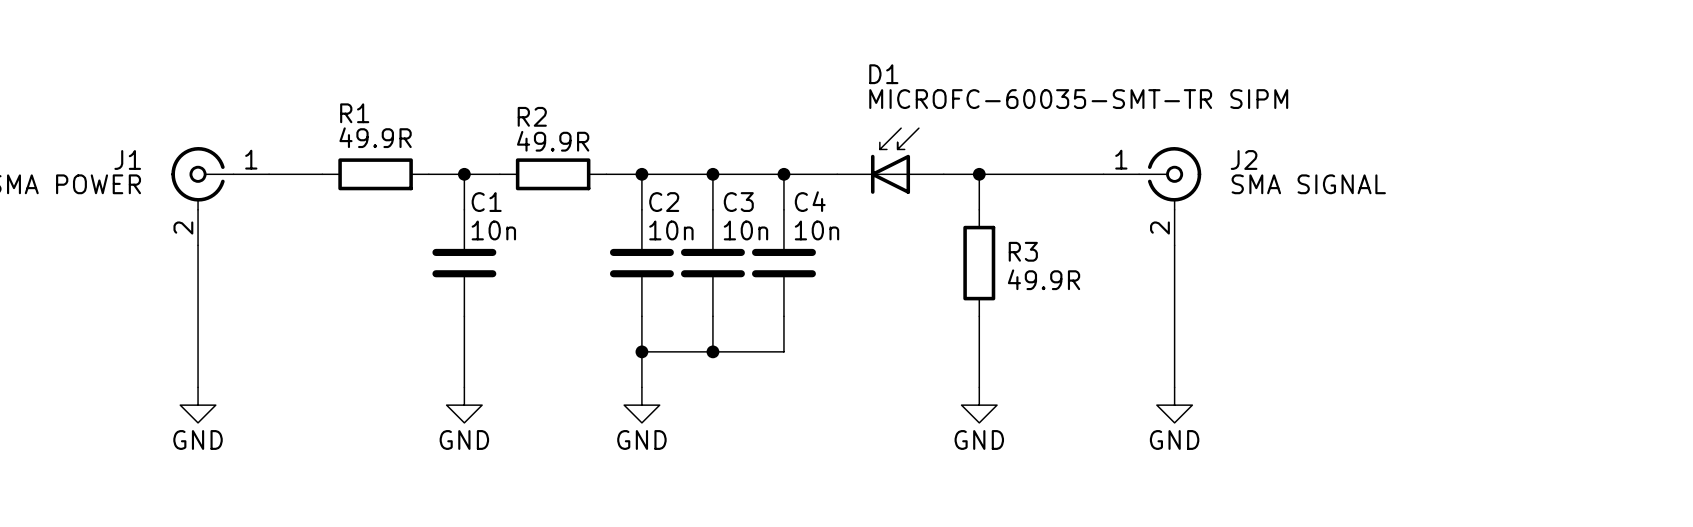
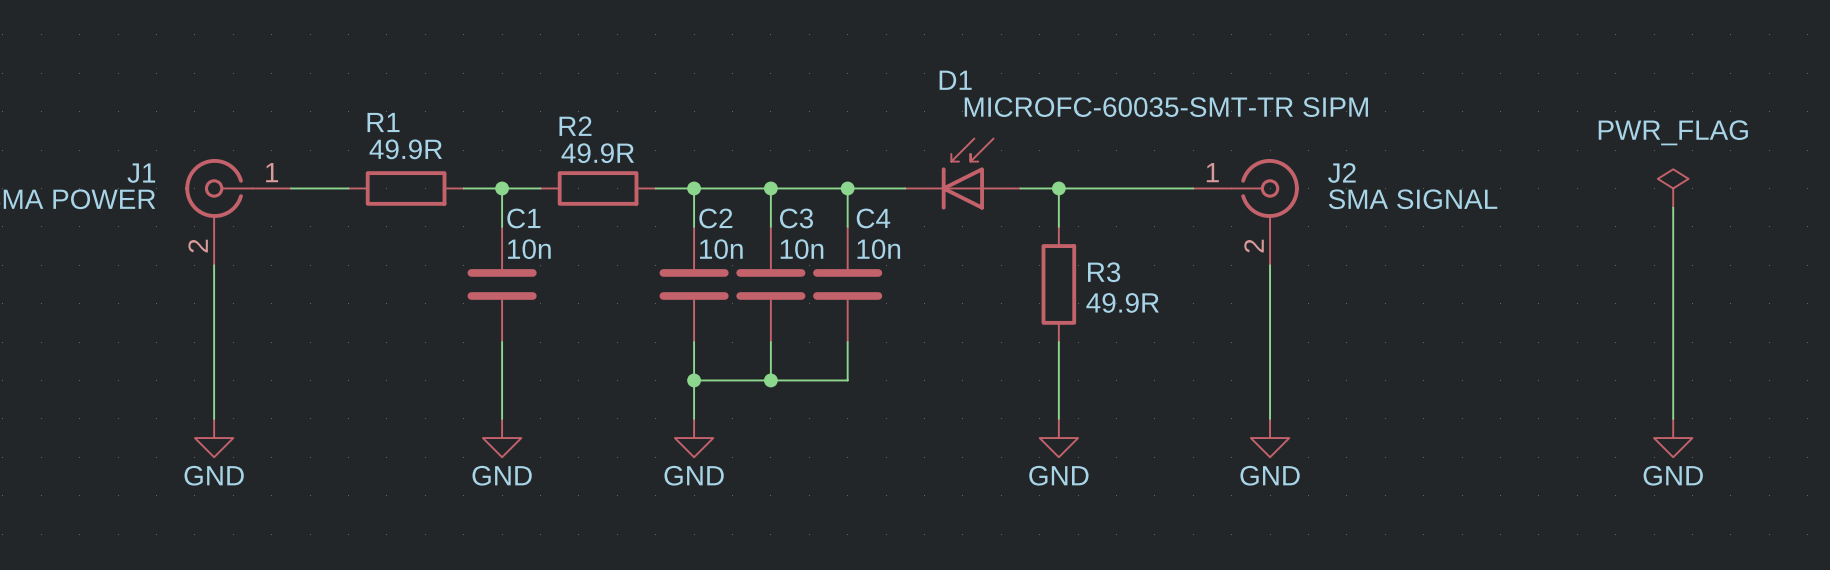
power symbol: none -> PWR_FLAG (1673, 188)
wire: none -> (1673, 207) (1673, 418)
power symbol: none -> GND (1673, 438)

